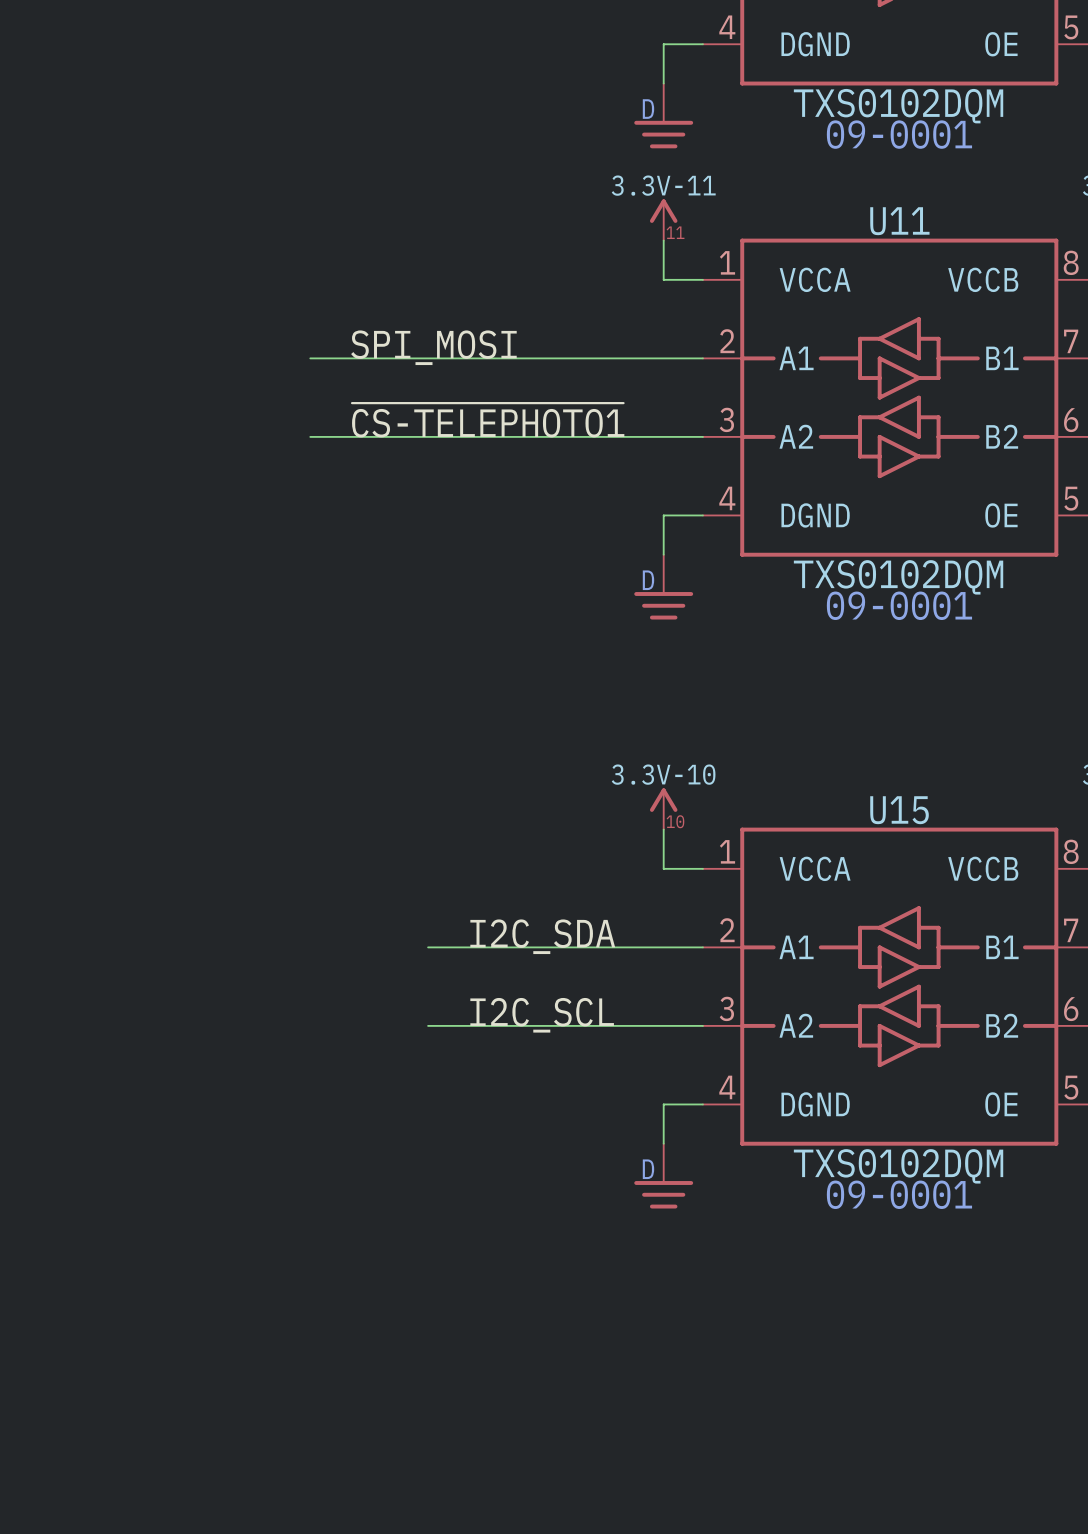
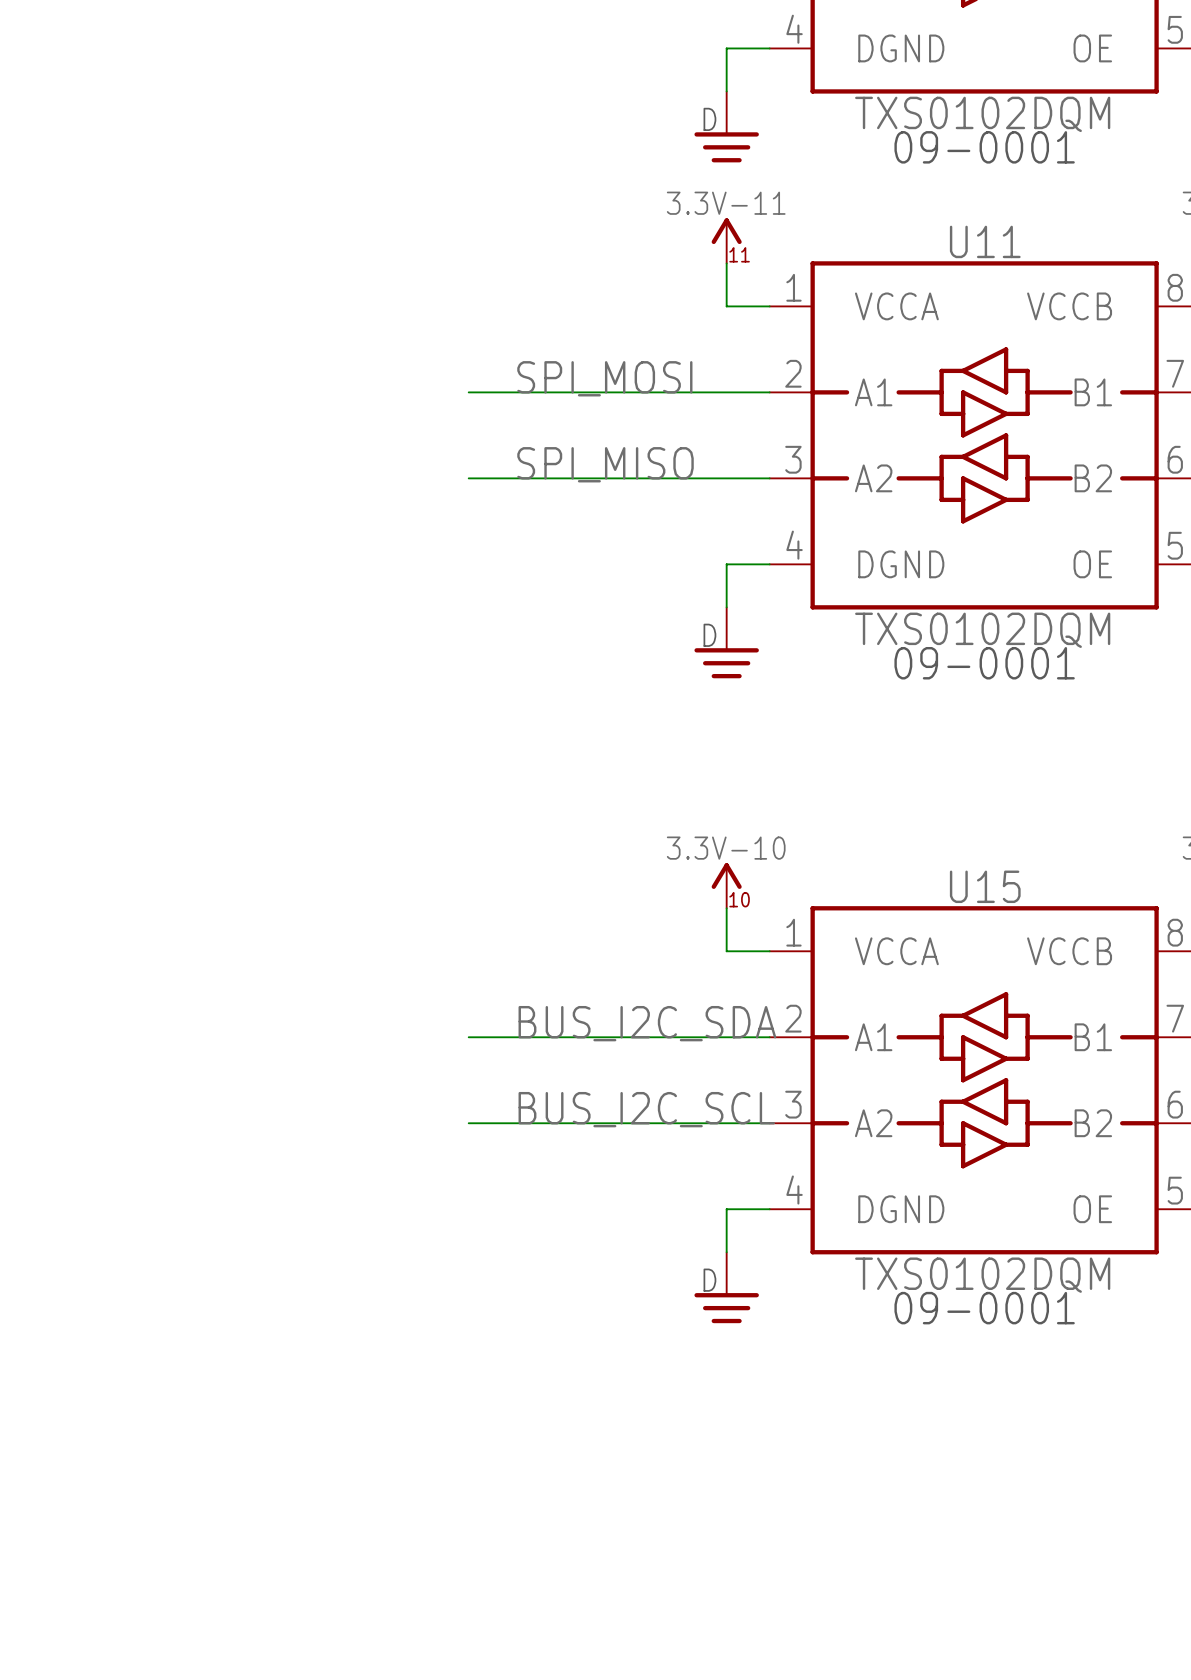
label position: SPI_MOSI (433, 347) -> SPI_MOSI (604, 378)
wire: (310, 358) (428, 358) -> none
label: ~{CS-TELEPHOTO1} (488, 420) -> none
label: none -> SPI_MISO (605, 464)
wire: (310, 436) (428, 436) -> none
label: I2C_SDA (542, 936) -> BUS_I2C_SDA (647, 1023)
label: I2C_SCL (542, 1015) -> BUS_I2C_SCL (646, 1109)

